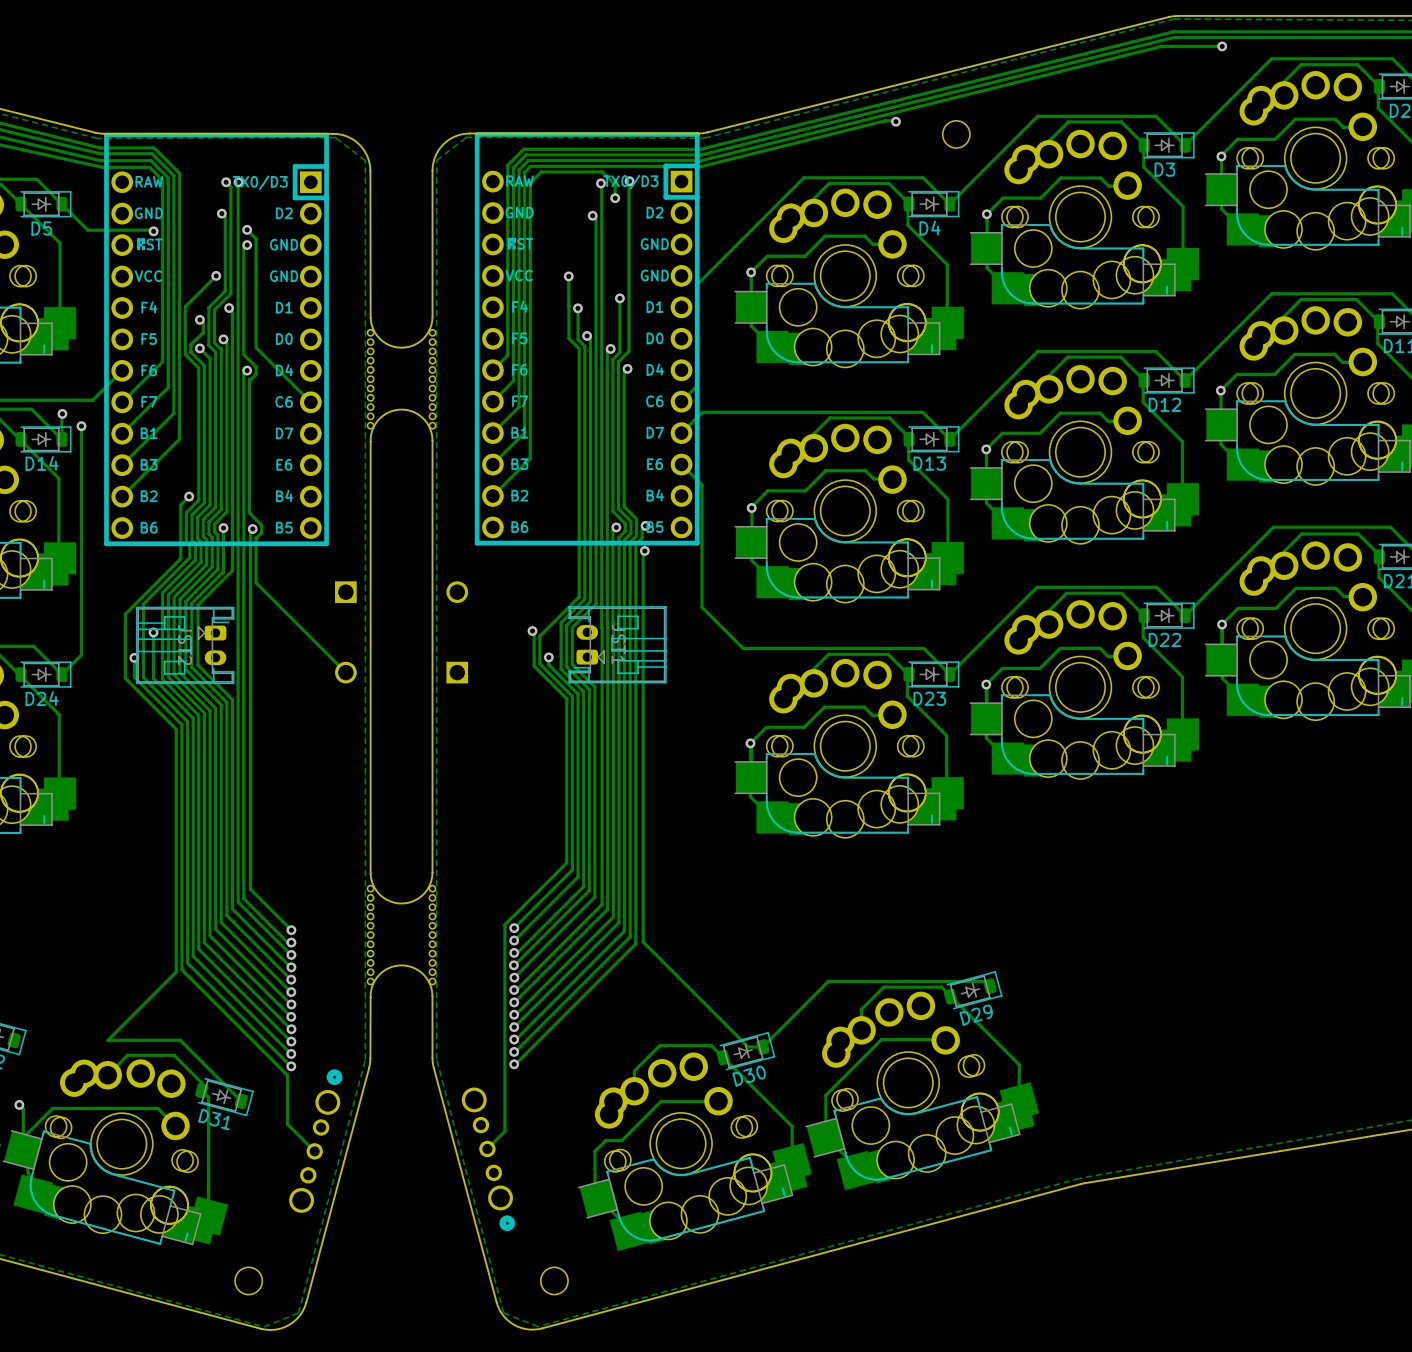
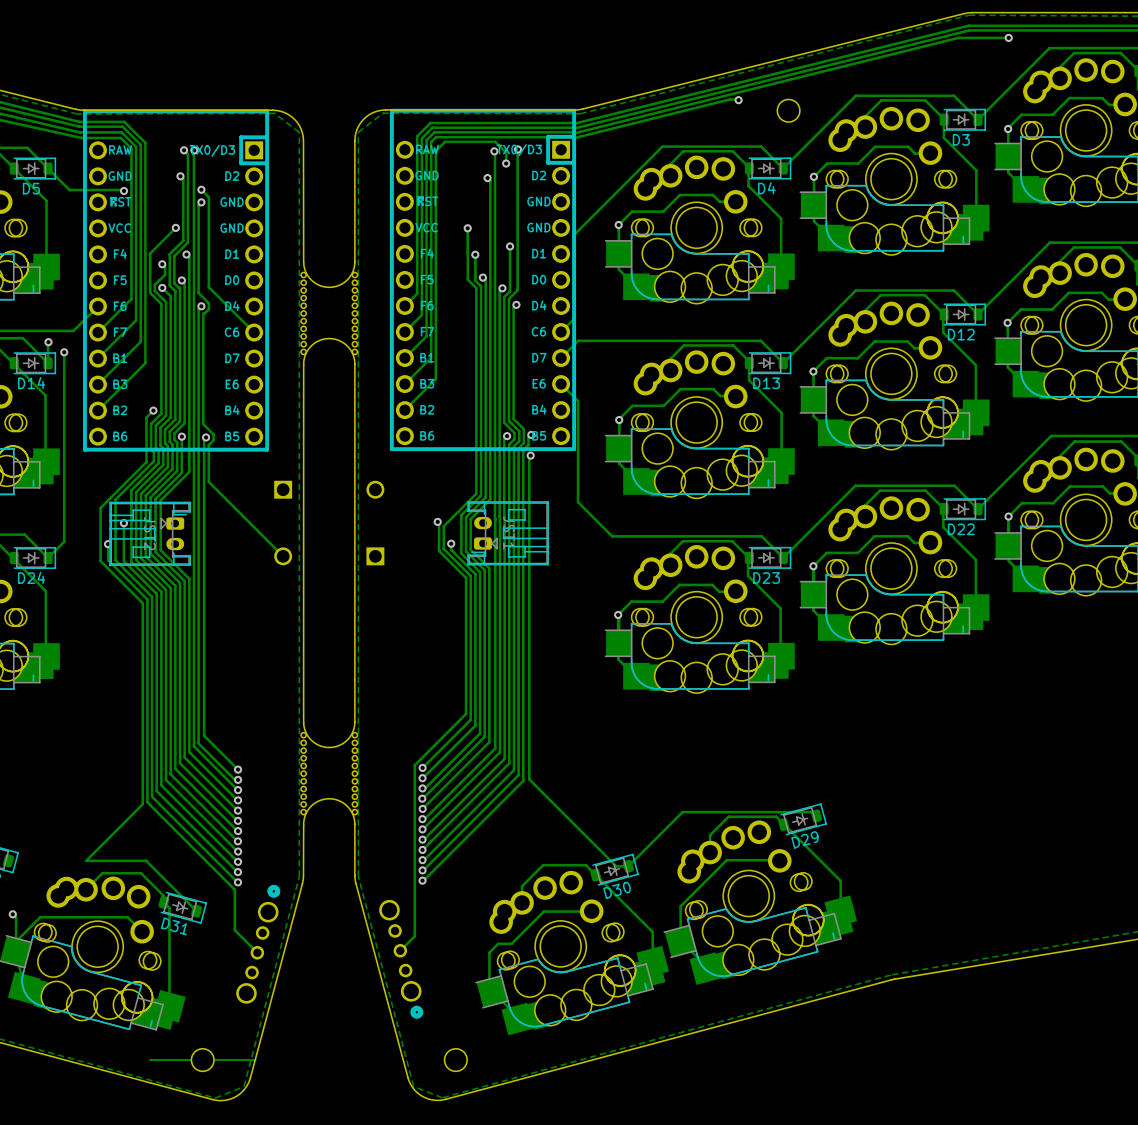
track: none -> (255, 1060) (149, 1060)

